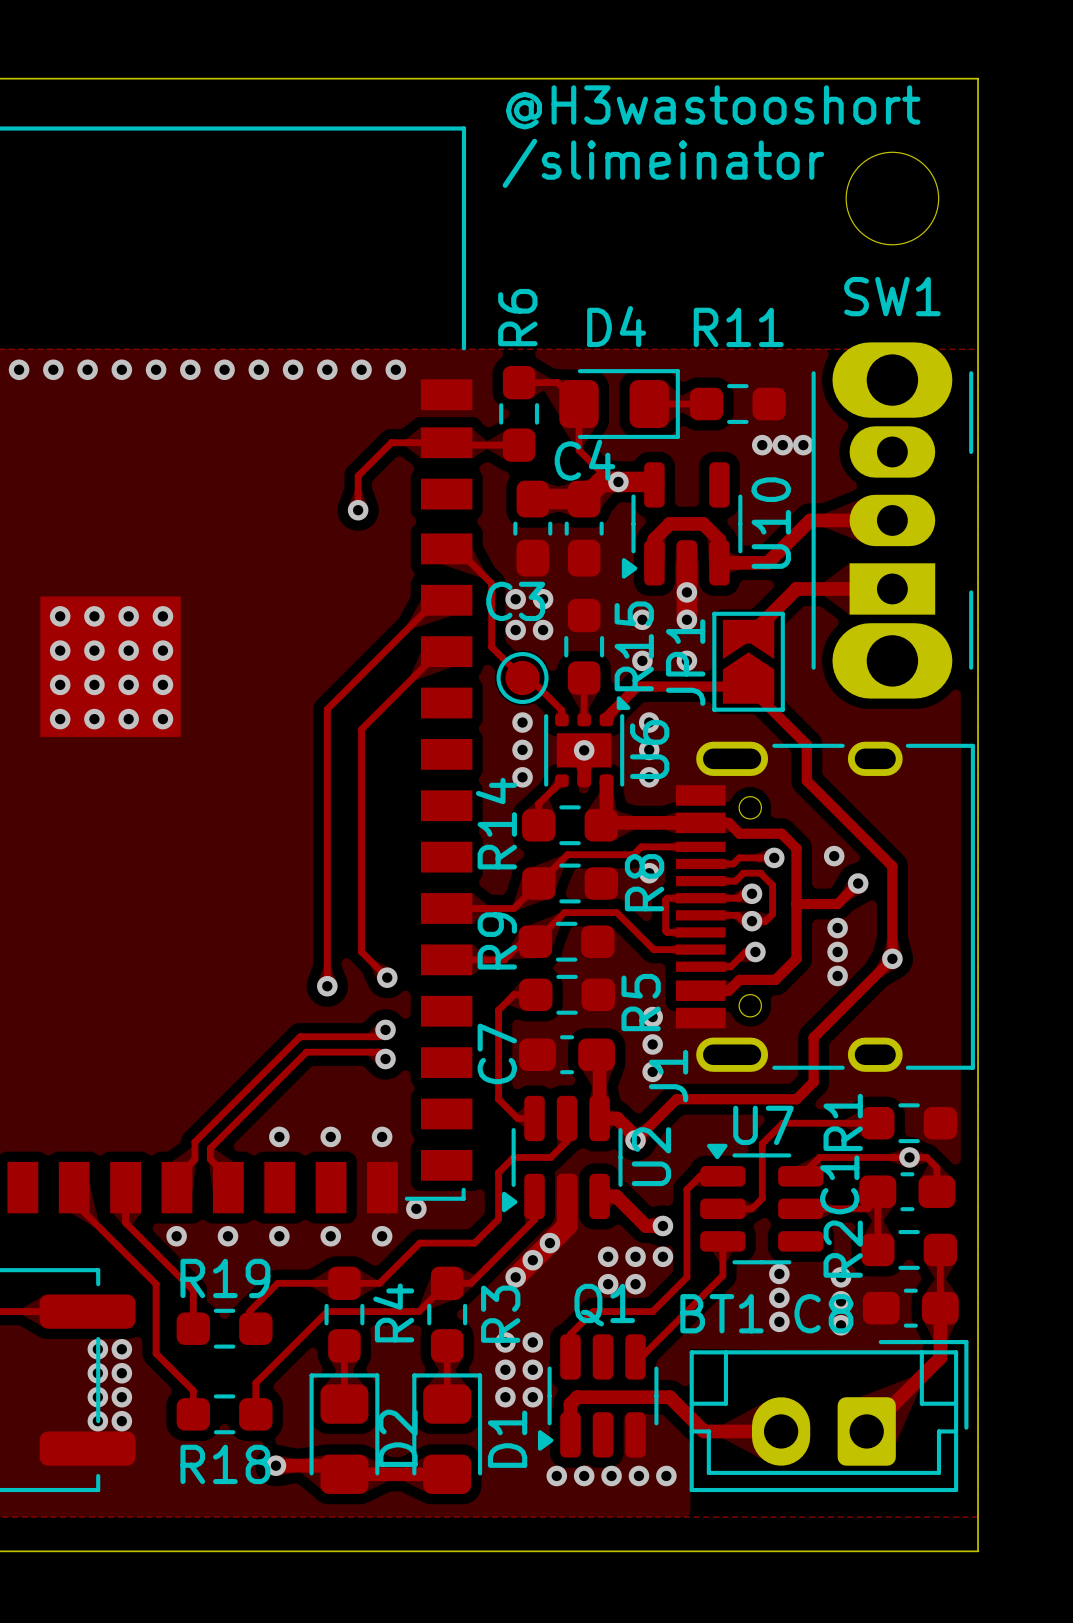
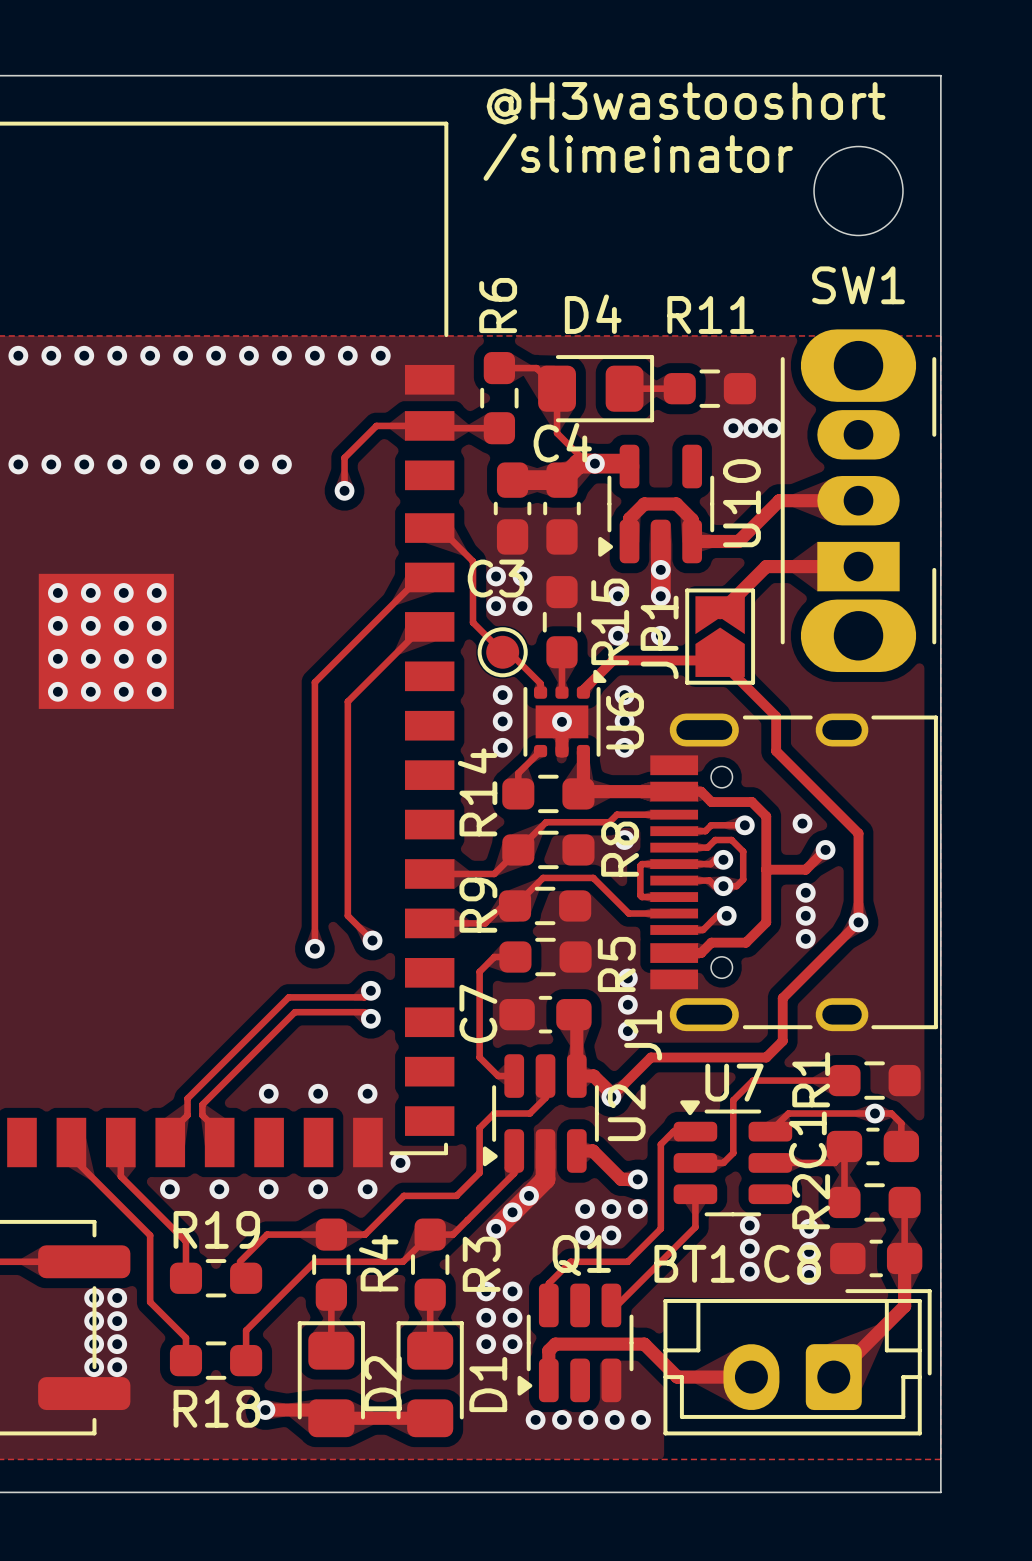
via: none -> (18, 464)
via: none -> (51, 464)
via: none -> (84, 464)
via: none -> (117, 464)
via: none -> (150, 464)
via: none -> (183, 464)
via: none -> (216, 464)
via: none -> (248, 464)
via: none -> (281, 464)

